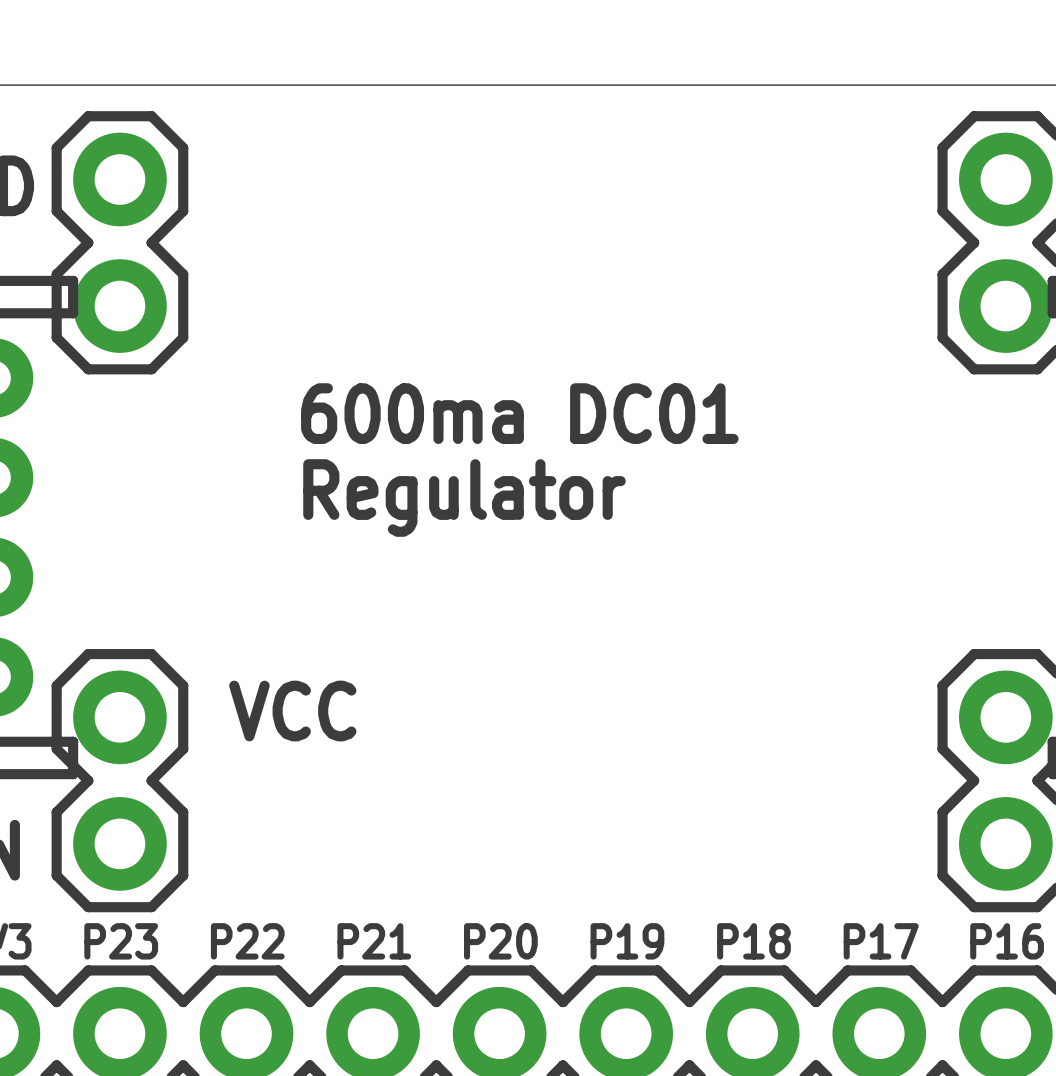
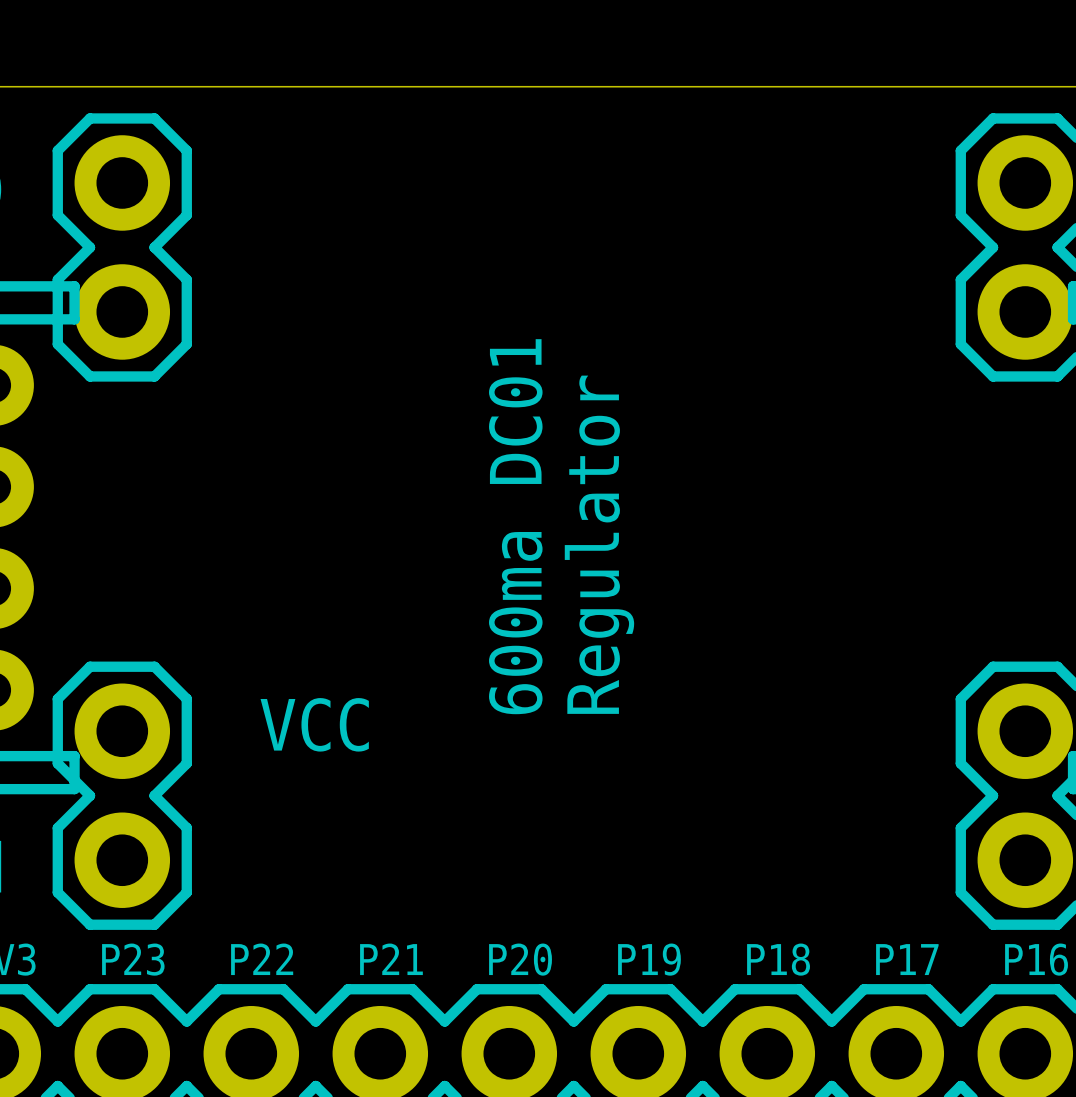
text rotation: 0° (519, 413) -> 90° counterclockwise (515, 526)
text rotation: 0° (464, 497) -> 90° counterclockwise (599, 544)

